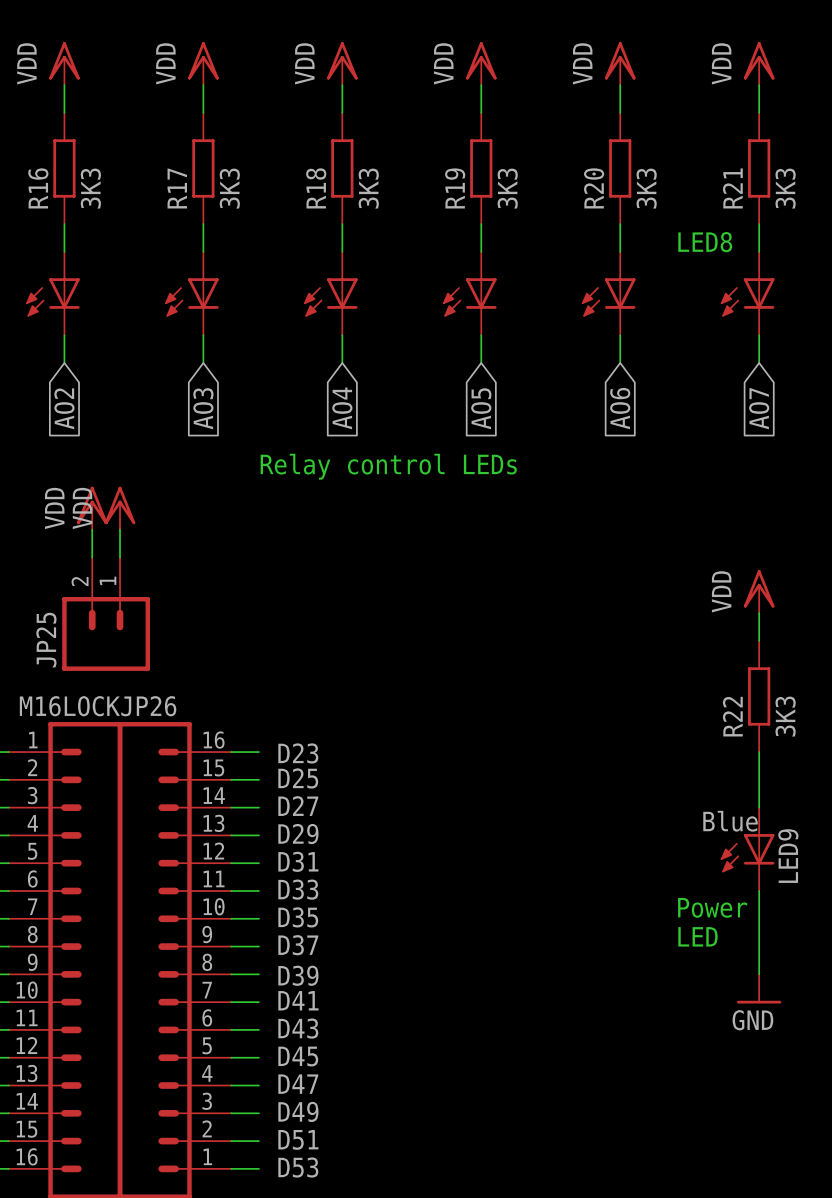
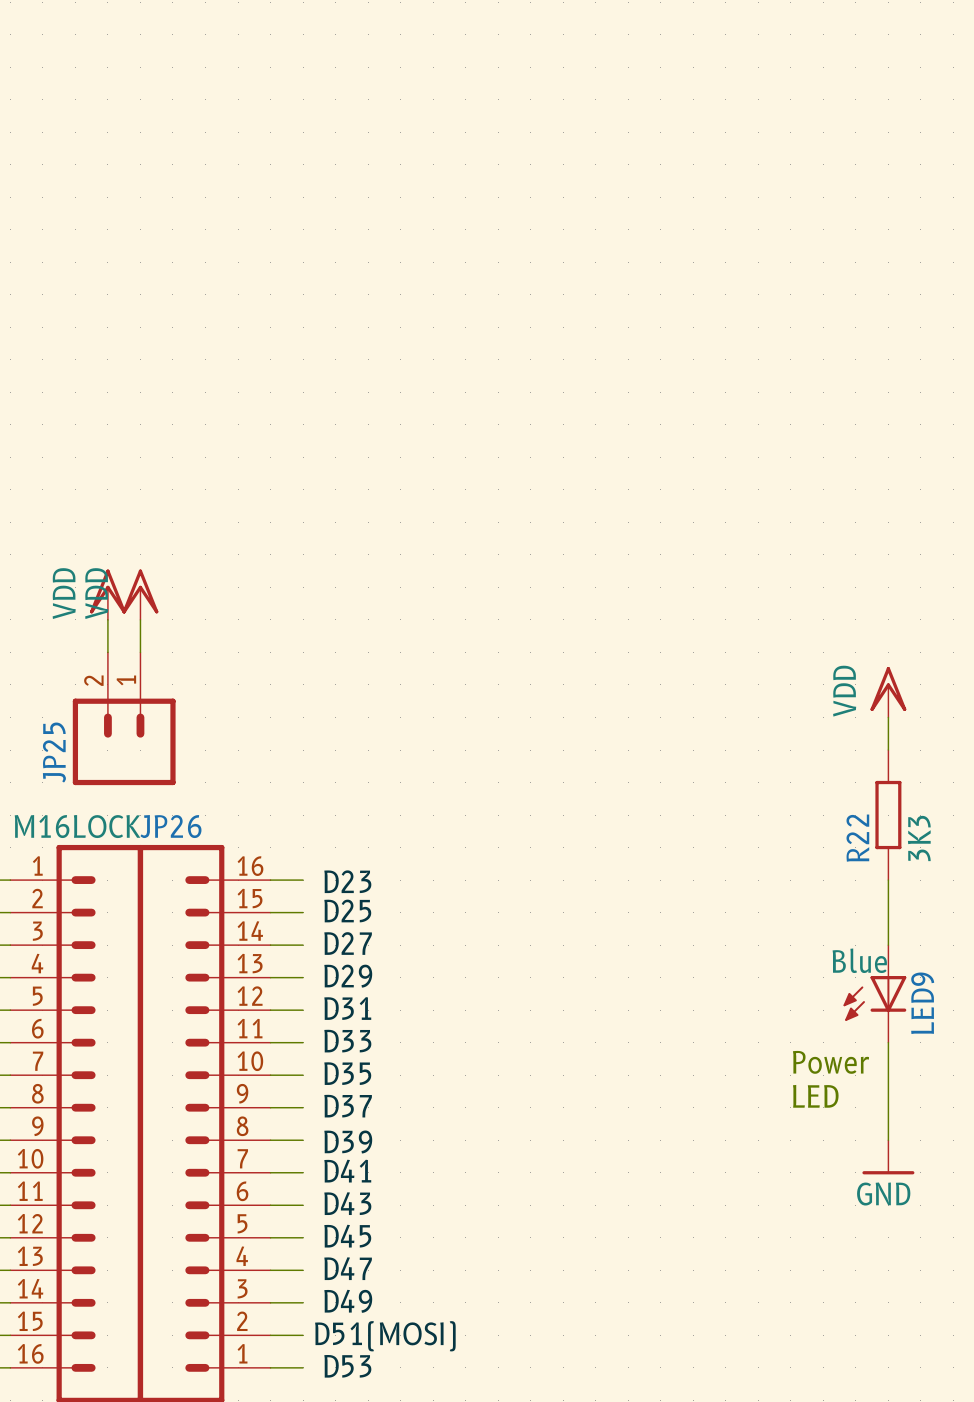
power symbol: VDD (64, 63) -> none
power symbol: VDD (203, 63) -> none
power symbol: VDD (342, 63) -> none
power symbol: VDD (481, 63) -> none
power symbol: VDD (620, 63) -> none
power symbol: VDD (759, 63) -> none
wire: (64, 85) (64, 112) -> none
wire: (203, 85) (203, 112) -> none
wire: (342, 85) (342, 112) -> none
wire: (481, 85) (481, 112) -> none
wire: (620, 85) (620, 112) -> none
wire: (759, 85) (759, 112) -> none
R16: 3K3 (64, 168) -> none
R17: 3K3 (203, 168) -> none
R18: 3K3 (342, 168) -> none
R19: 3K3 (481, 168) -> none
R20: 3K3 (620, 168) -> none
R21: 3K3 (759, 168) -> none
wire: (64, 224) (64, 251) -> none
wire: (203, 224) (203, 251) -> none
wire: (342, 224) (342, 251) -> none
wire: (481, 224) (481, 251) -> none
wire: (620, 224) (620, 251) -> none
wire: (759, 224) (759, 251) -> none
text: LED8 (705, 242) -> none
part: (52, 293) -> none
part: (191, 293) -> none
part: (330, 293) -> none
part: (469, 293) -> none
part: (608, 293) -> none
part: (747, 293) -> none
wire: (64, 335) (64, 363) -> none
wire: (203, 335) (203, 363) -> none
wire: (342, 335) (342, 363) -> none
wire: (481, 335) (481, 363) -> none
wire: (620, 335) (620, 363) -> none
wire: (759, 335) (759, 363) -> none
global label: AO2 (64, 408) -> none
global label: AO3 (203, 408) -> none
global label: AO4 (342, 408) -> none
global label: AO5 (481, 408) -> none
global label: AO6 (620, 408) -> none
global label: AO7 (759, 408) -> none
text: Relay control LEDs (388, 466) -> none
label: D51 (298, 1139) -> none
label: none -> D51(MOSI) (385, 1336)

